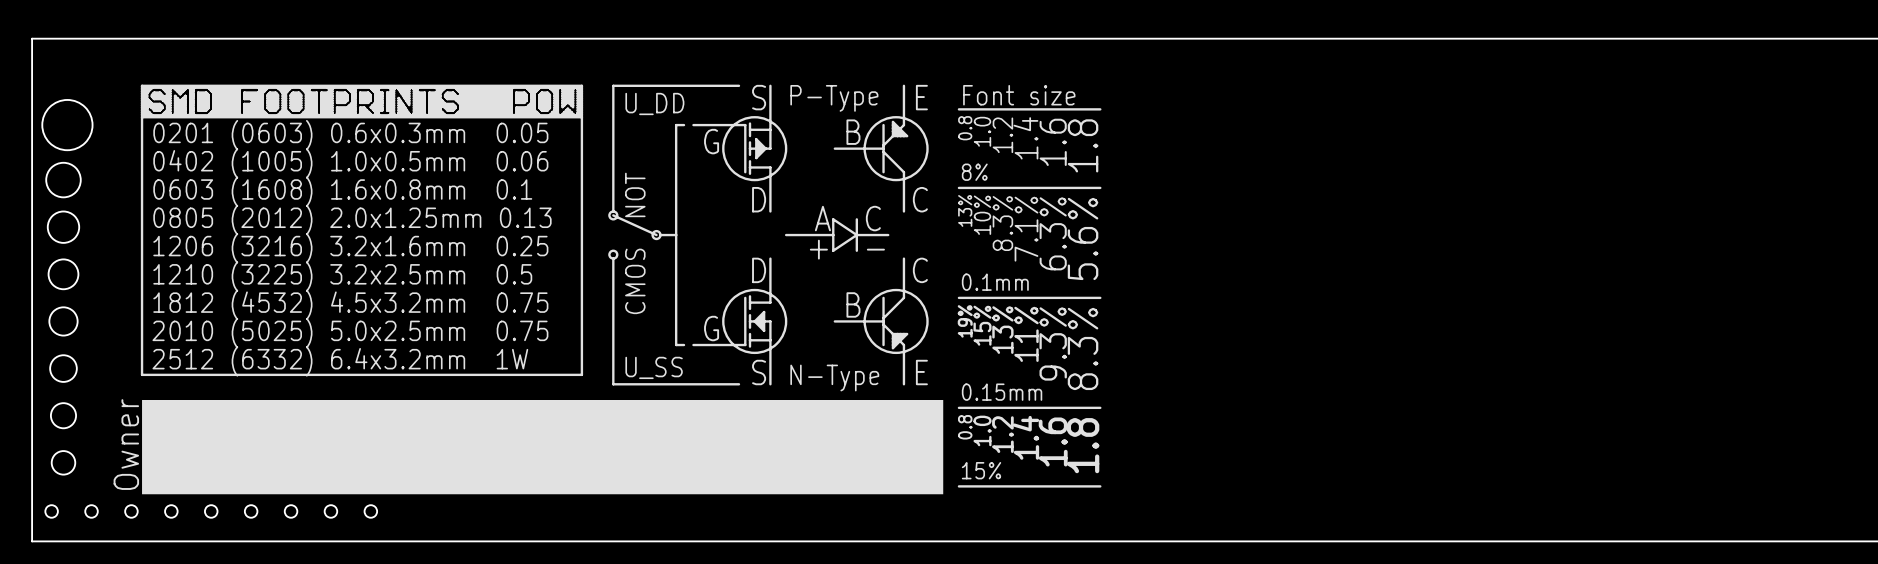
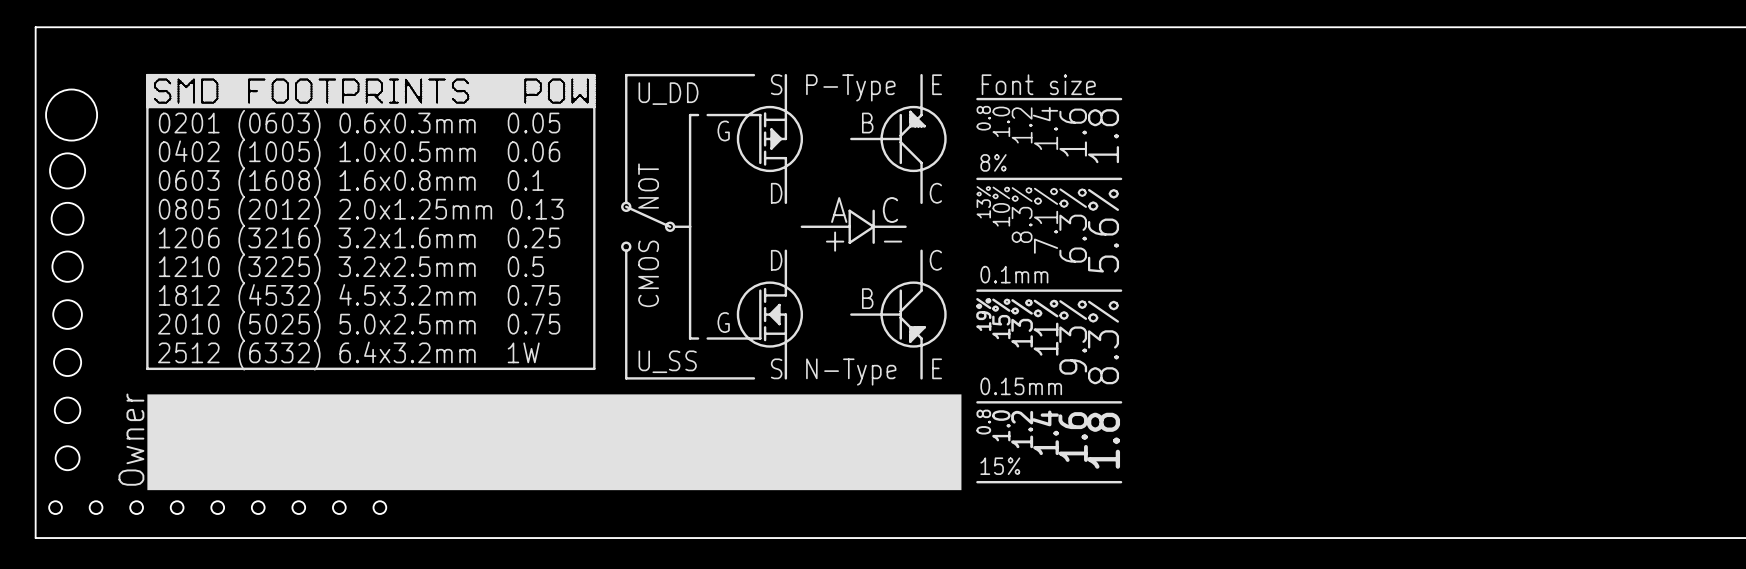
drawing shape: [692, 84, 788, 213] -> [706, 73, 804, 205]
drawing shape: [833, 84, 929, 213] -> [850, 73, 947, 205]
drawing shape: [692, 257, 788, 386] -> [706, 249, 804, 380]
drawing shape: [833, 257, 929, 386] -> [850, 249, 947, 380]

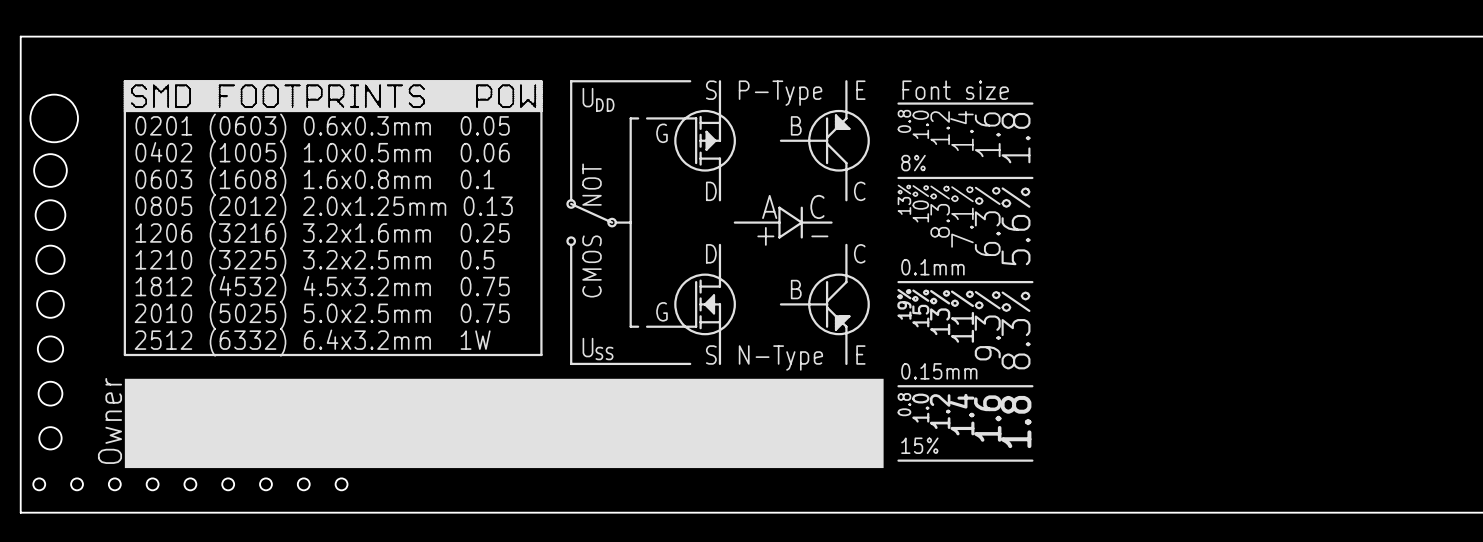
text: U_DD (668, 93) -> U (587, 97)
text: none -> DD (605, 105)
text: U_SS (667, 361) -> U (587, 347)
text: none -> SS (604, 353)

